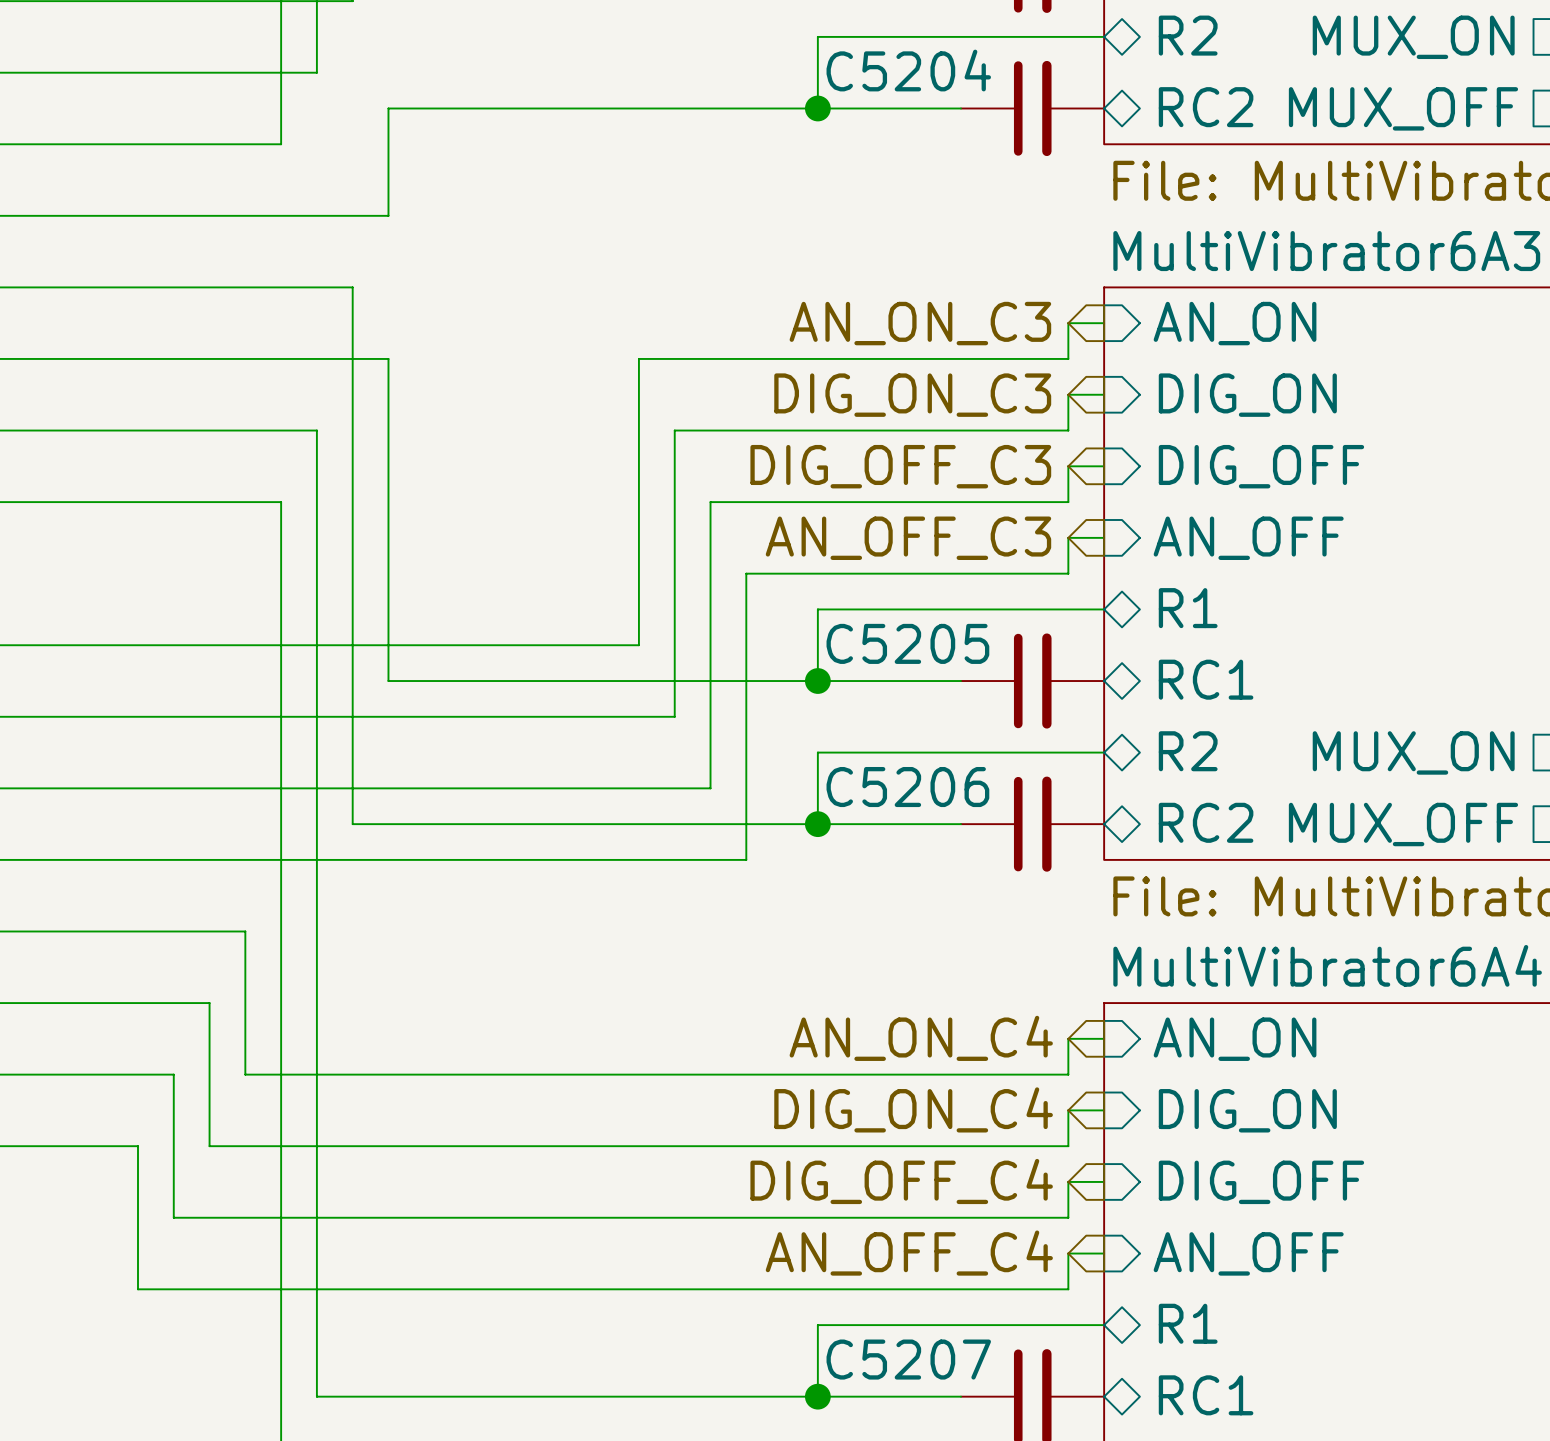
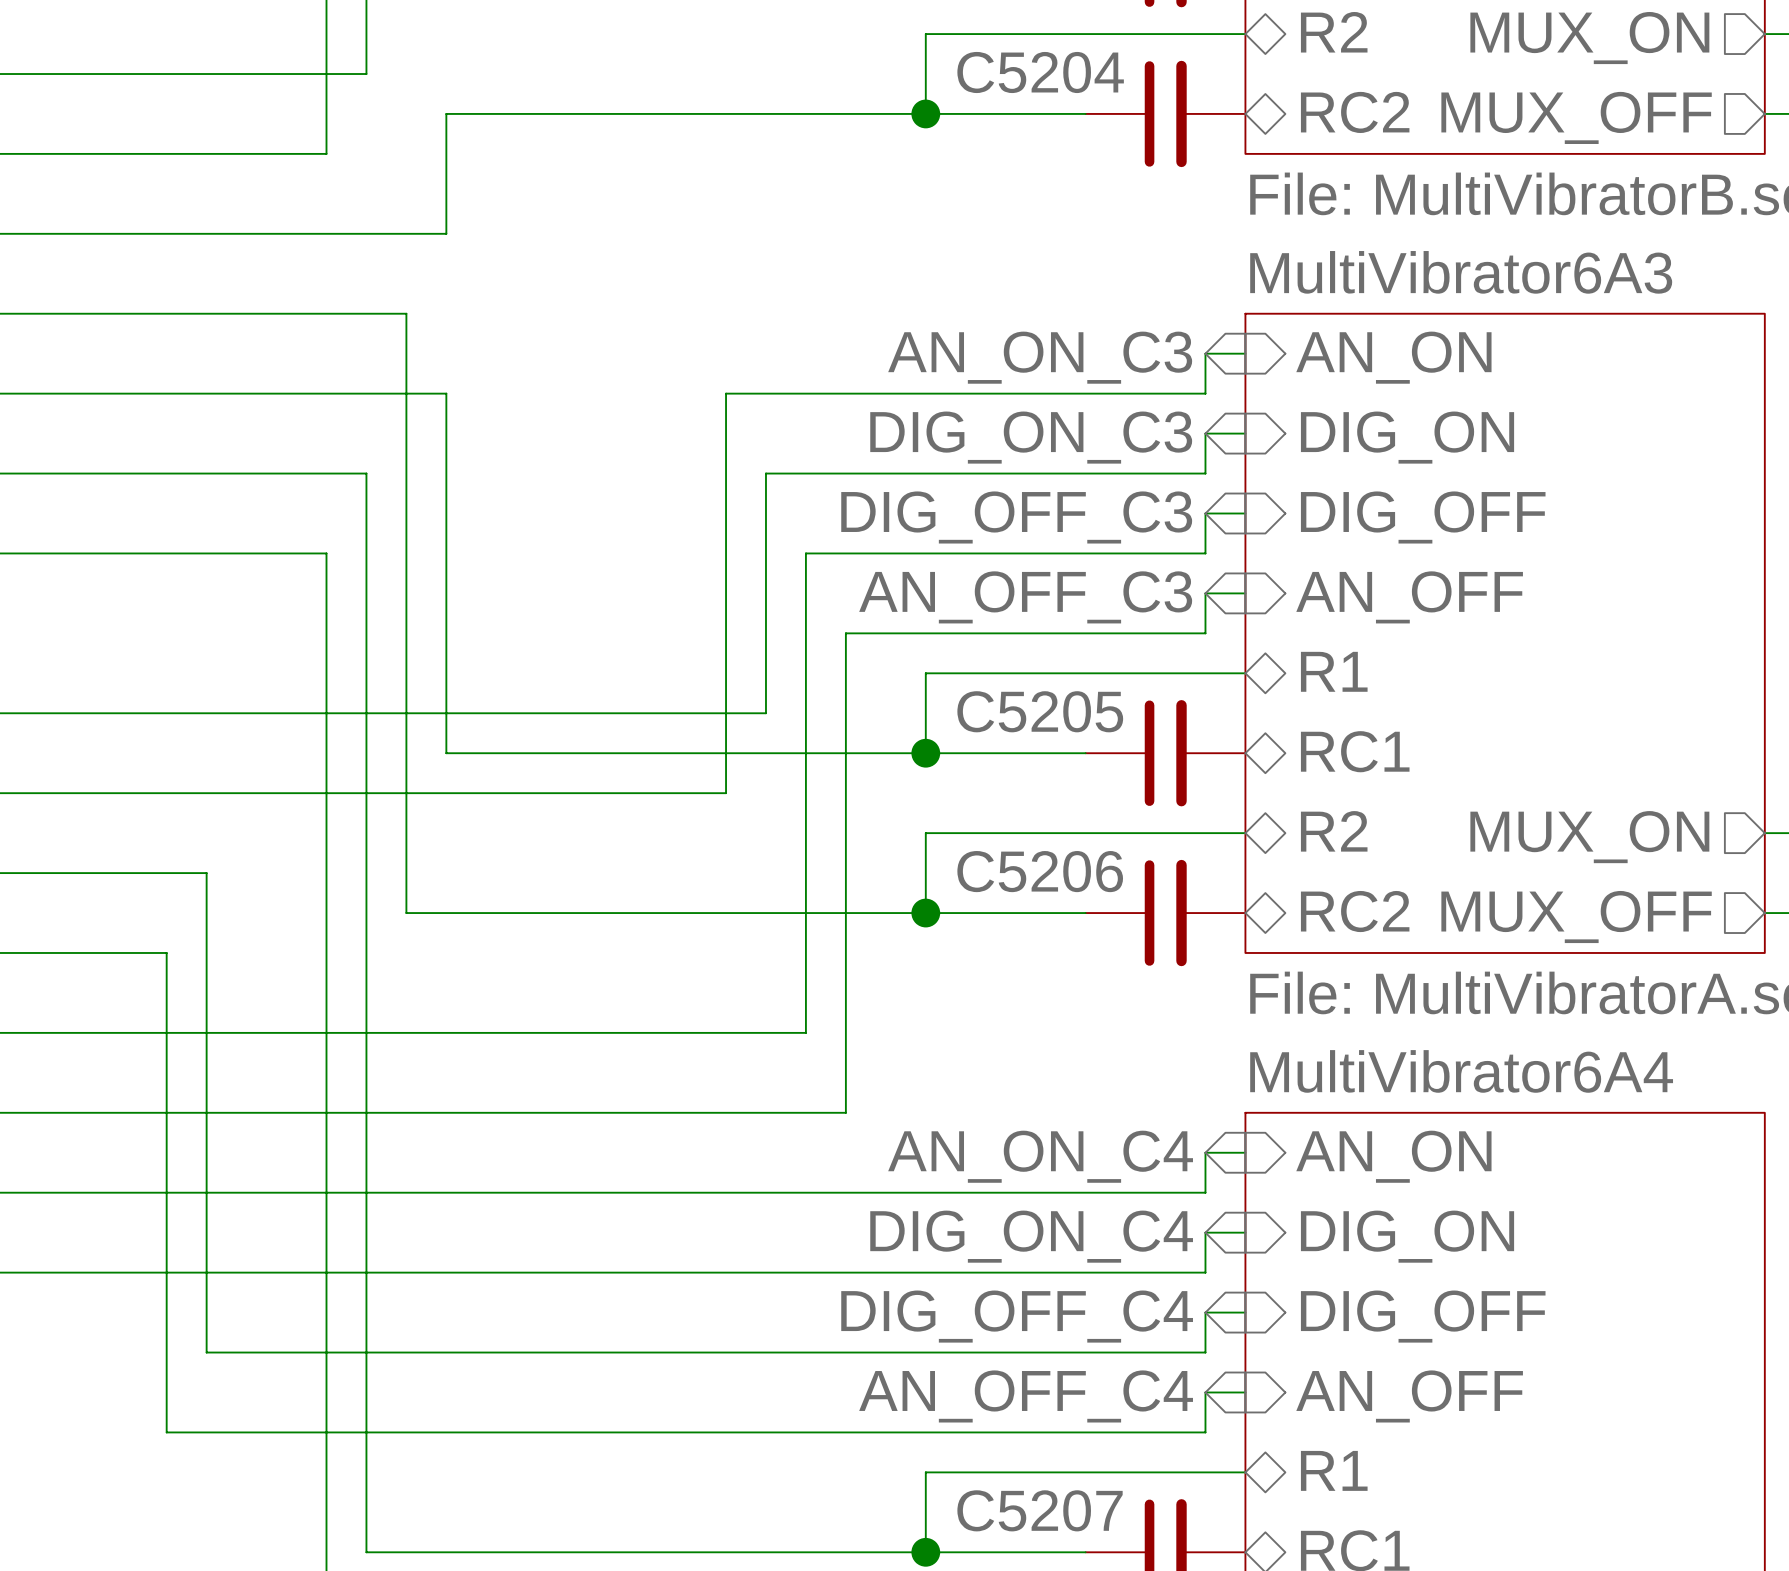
wire: (674, 645) (674, 716) (638, 716) -> (765, 713) (726, 713) (726, 793)
wire: (173, 788) (710, 788) -> (286, 1032) (805, 1032) (805, 873)
wire: (138, 859) (746, 859) -> (246, 1112) (845, 1112) (845, 952)
wire: (245, 931) (245, 1074) -> (206, 873) (206, 1192) (286, 1192)
wire: (209, 1003) (209, 1146) -> (166, 952) (166, 1272) (246, 1272)

